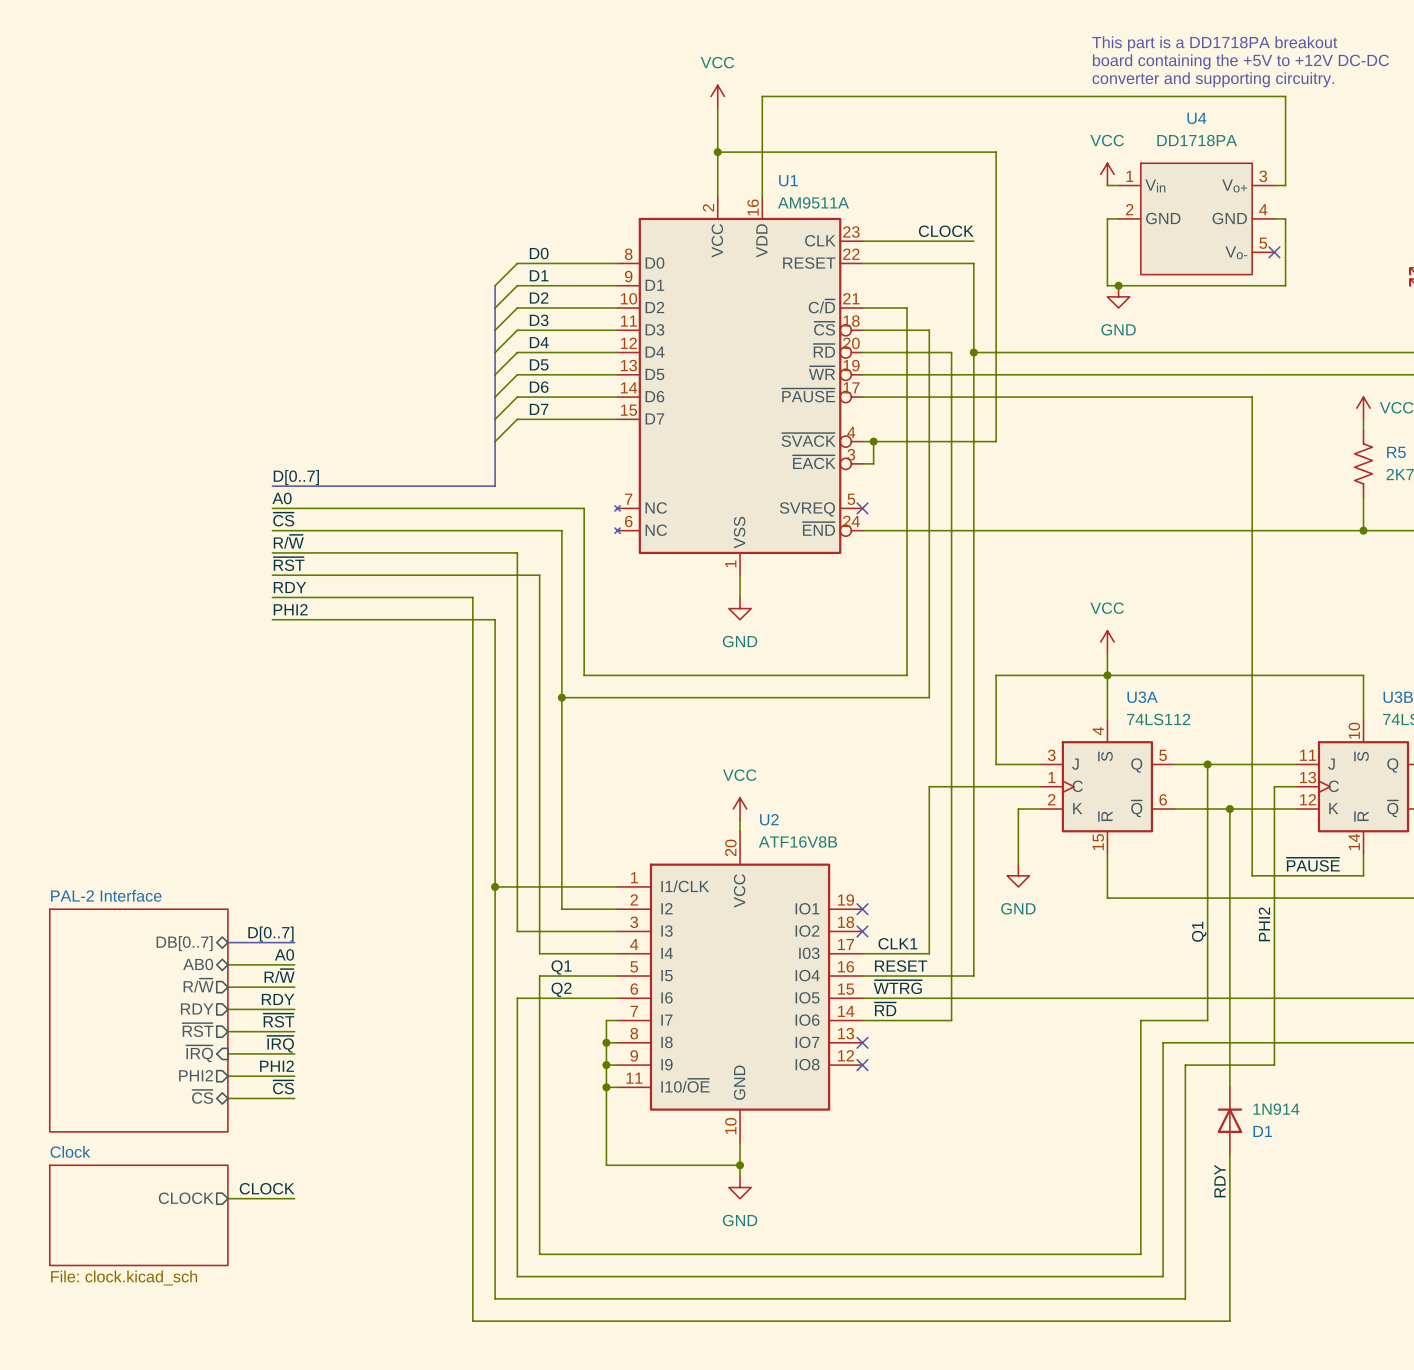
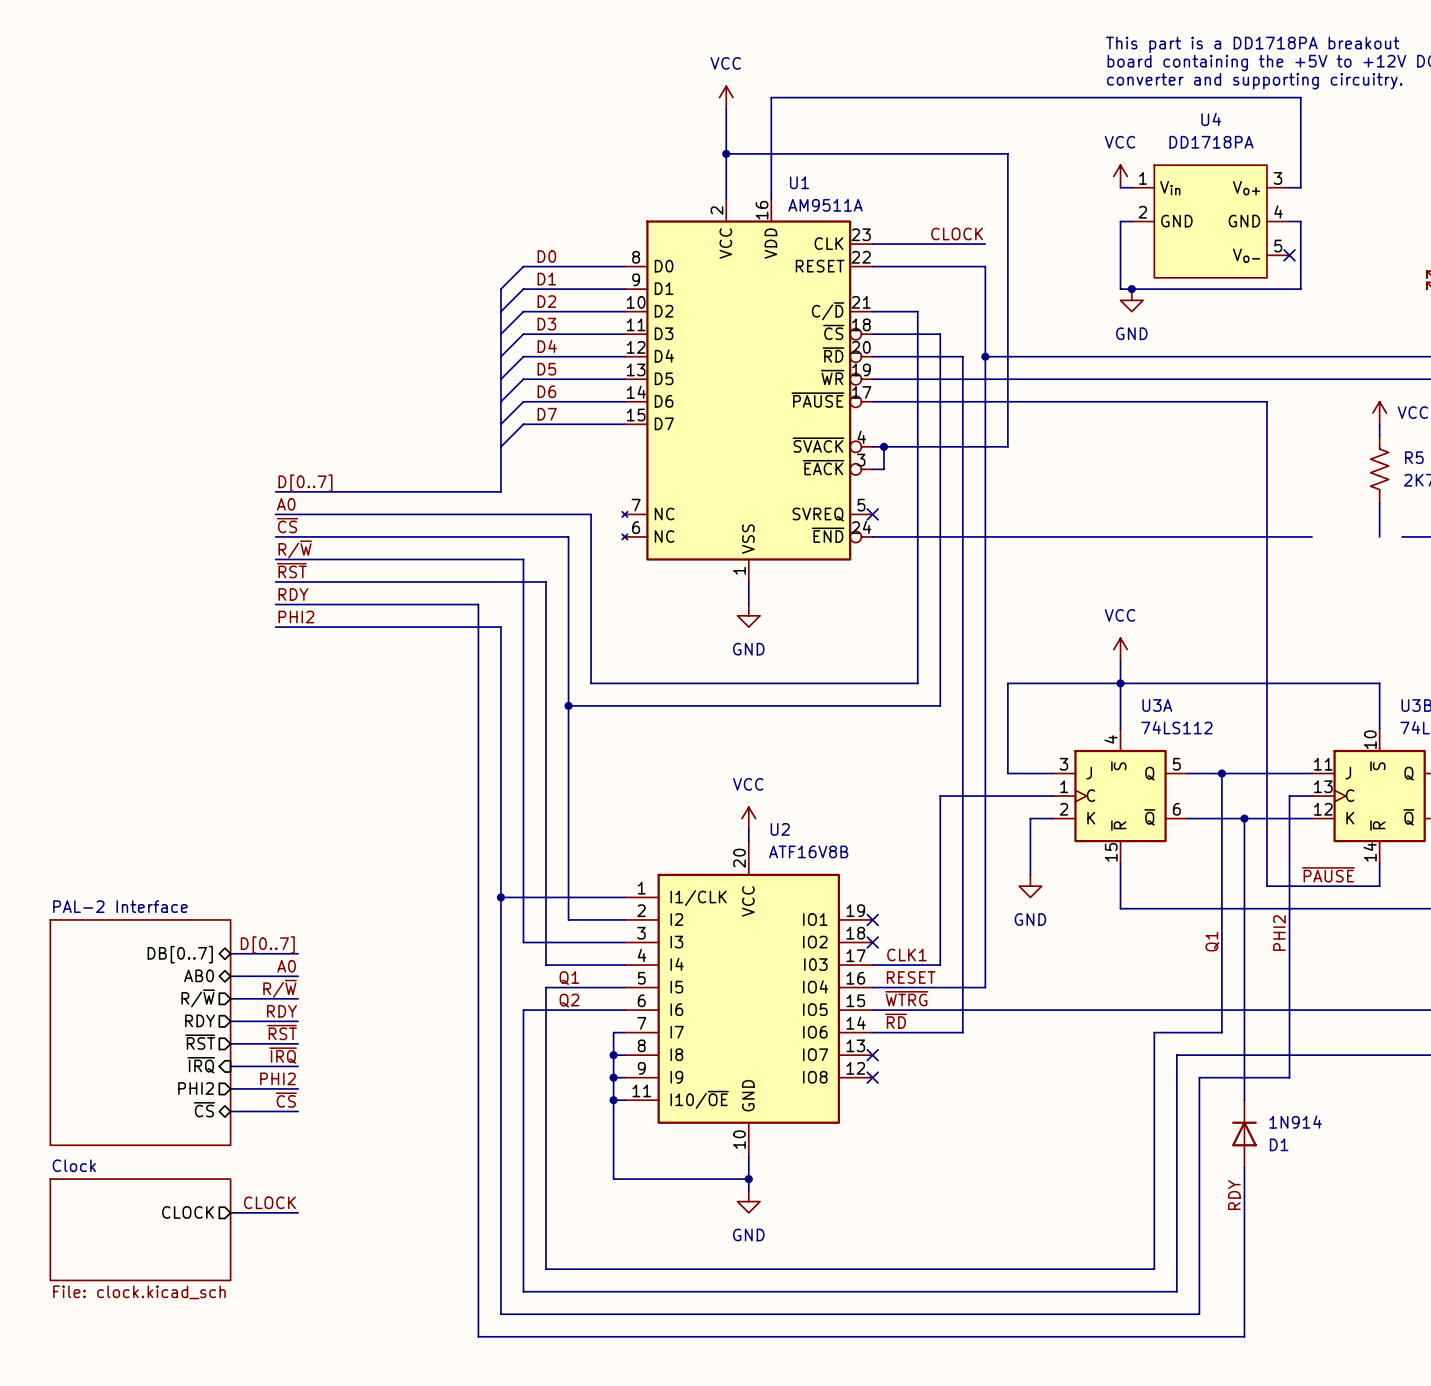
wire: (1296, 530) (1385, 530) -> none
junction: (1363, 530) -> none

